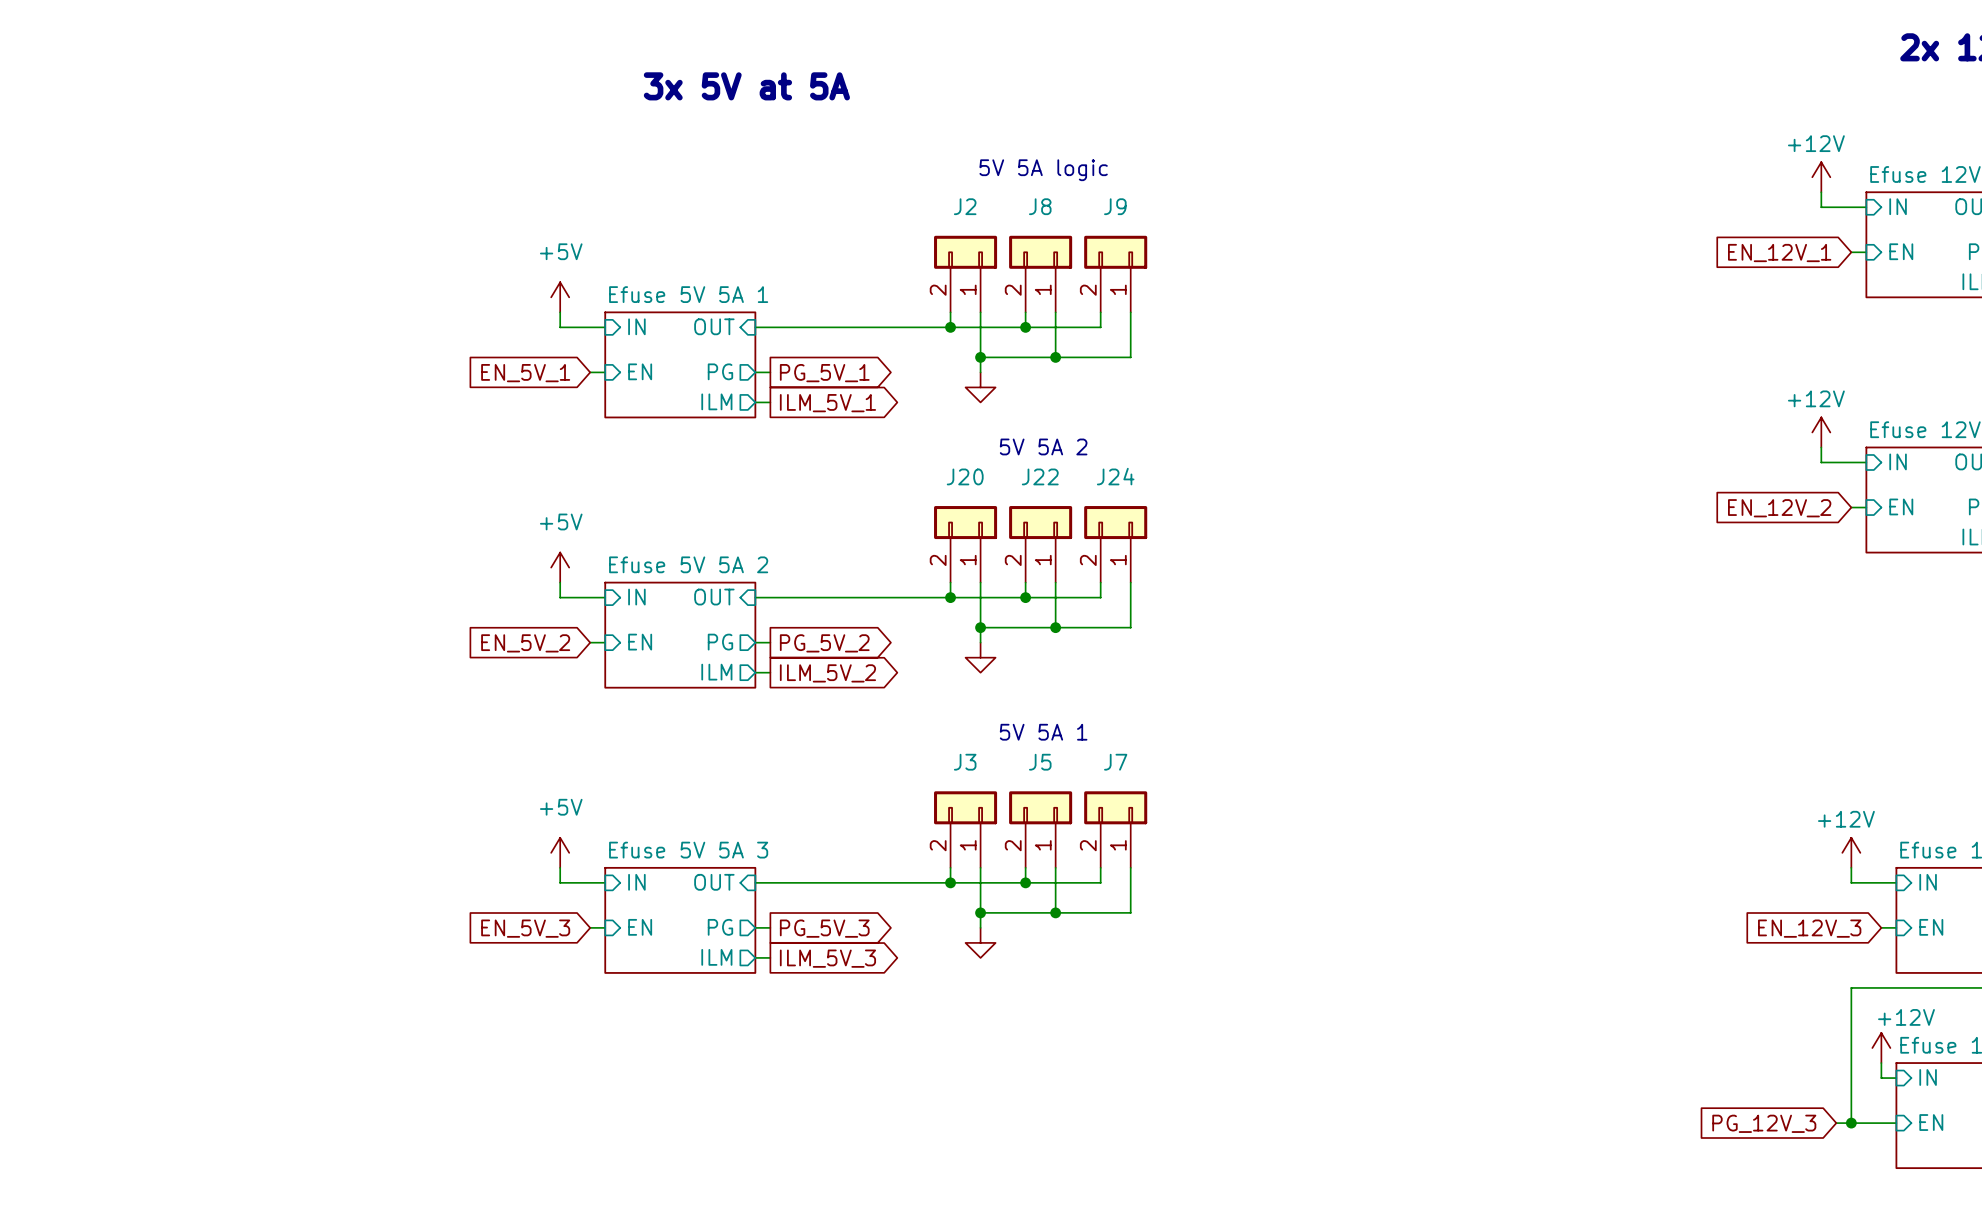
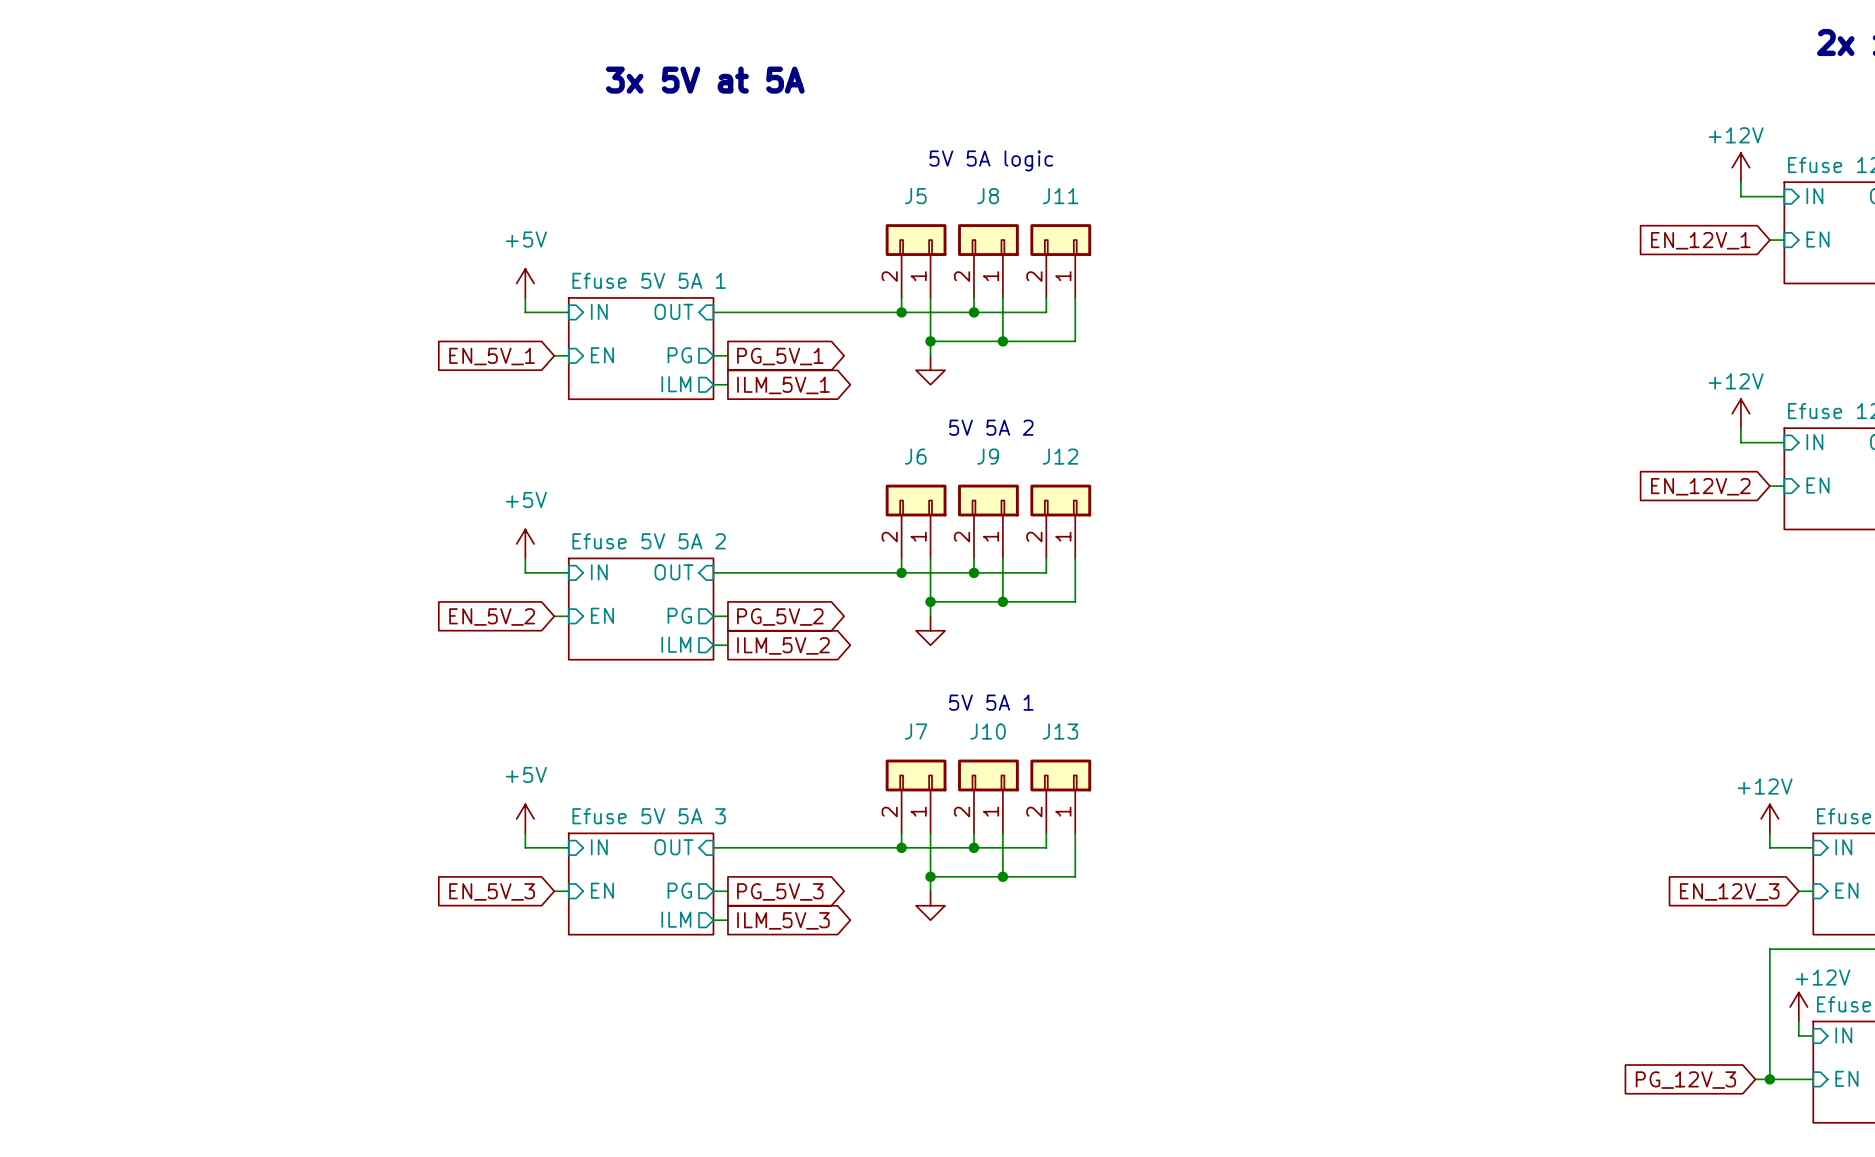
J2 name: J2 (965, 206) -> J5 (915, 196)
J9 name: J9 (1115, 206) -> J11 (1060, 196)
J20 name: J20 (965, 476) -> J6 (915, 456)
J22 name: J22 (1040, 476) -> J9 (988, 456)
J24 name: J24 (1115, 476) -> J12 (1060, 456)
J3 name: J3 (965, 762) -> J7 (916, 731)
J5 name: J5 (1040, 762) -> J10 (988, 731)
J7 name: J7 (1115, 762) -> J13 (1060, 731)

